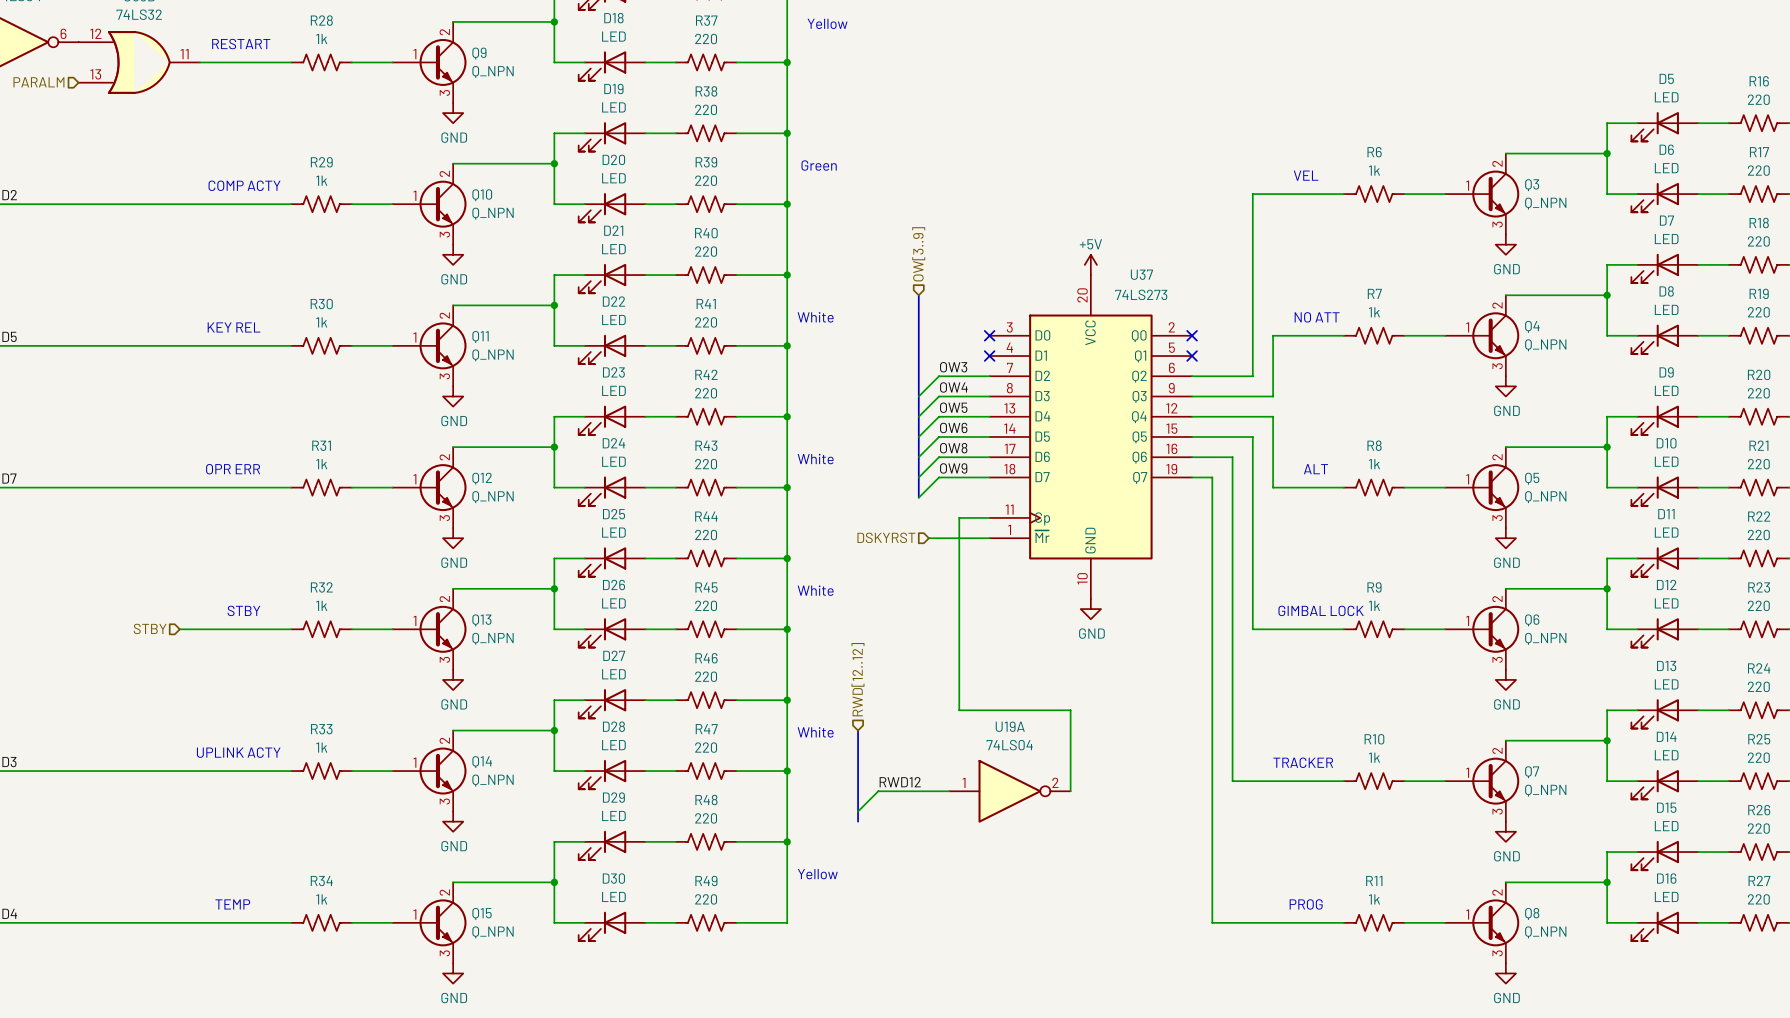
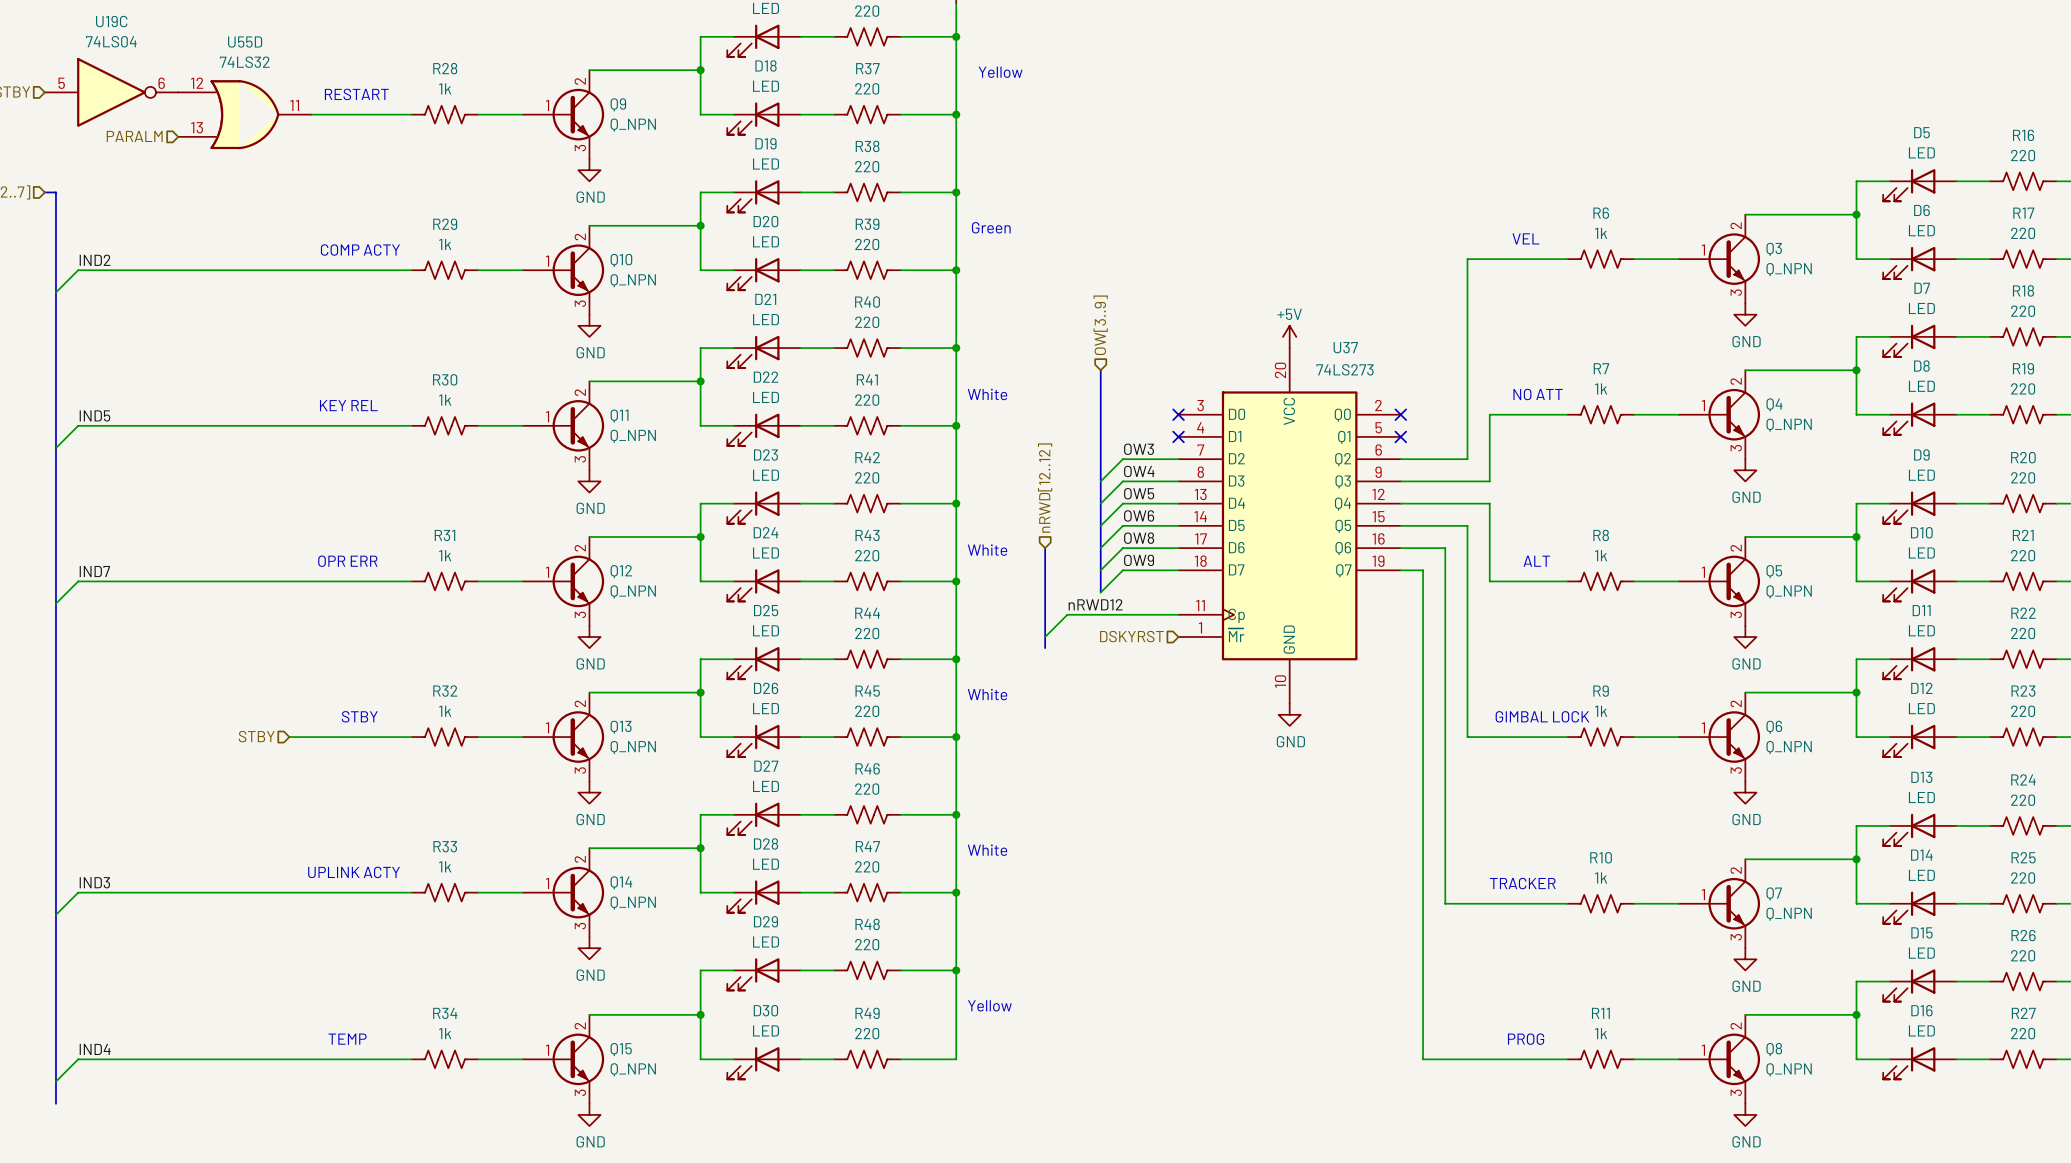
hierarchical label: none -> nRWD[12..12] (1045, 488)
bus: none -> (1045, 548) (1045, 648)
label: none -> nRWD12 (1095, 604)
wire: (959, 517) (959, 710) (1070, 710) (1070, 791) -> (1145, 614) (1067, 614) (1045, 637)
hierarchical label position: DSKYRST (886, 537) -> DSKYRST (1131, 636)
wire: (928, 538) (989, 538) -> none
hierarchical label: RWD[12..12] (858, 679) -> none
bus: (858, 730) (858, 821) -> none
label: RWD12 (900, 782) -> none
wire: (949, 791) (878, 791) (858, 811) -> none
U19A: 74LS04 (1009, 791) -> none

